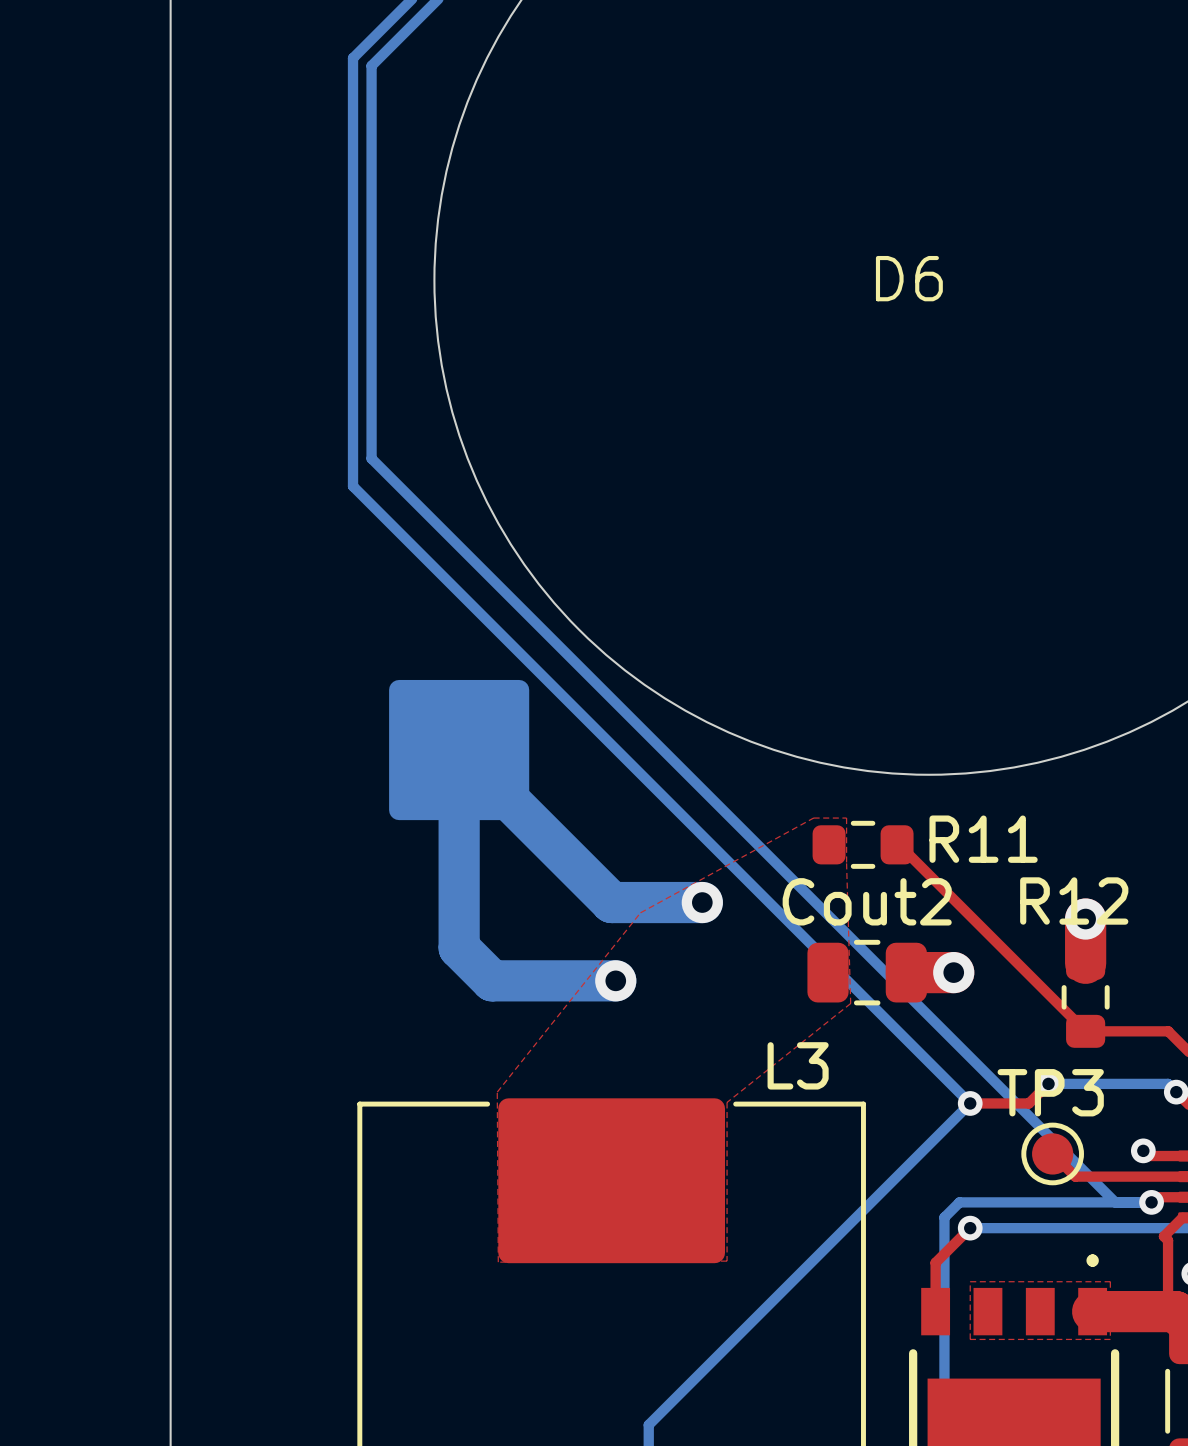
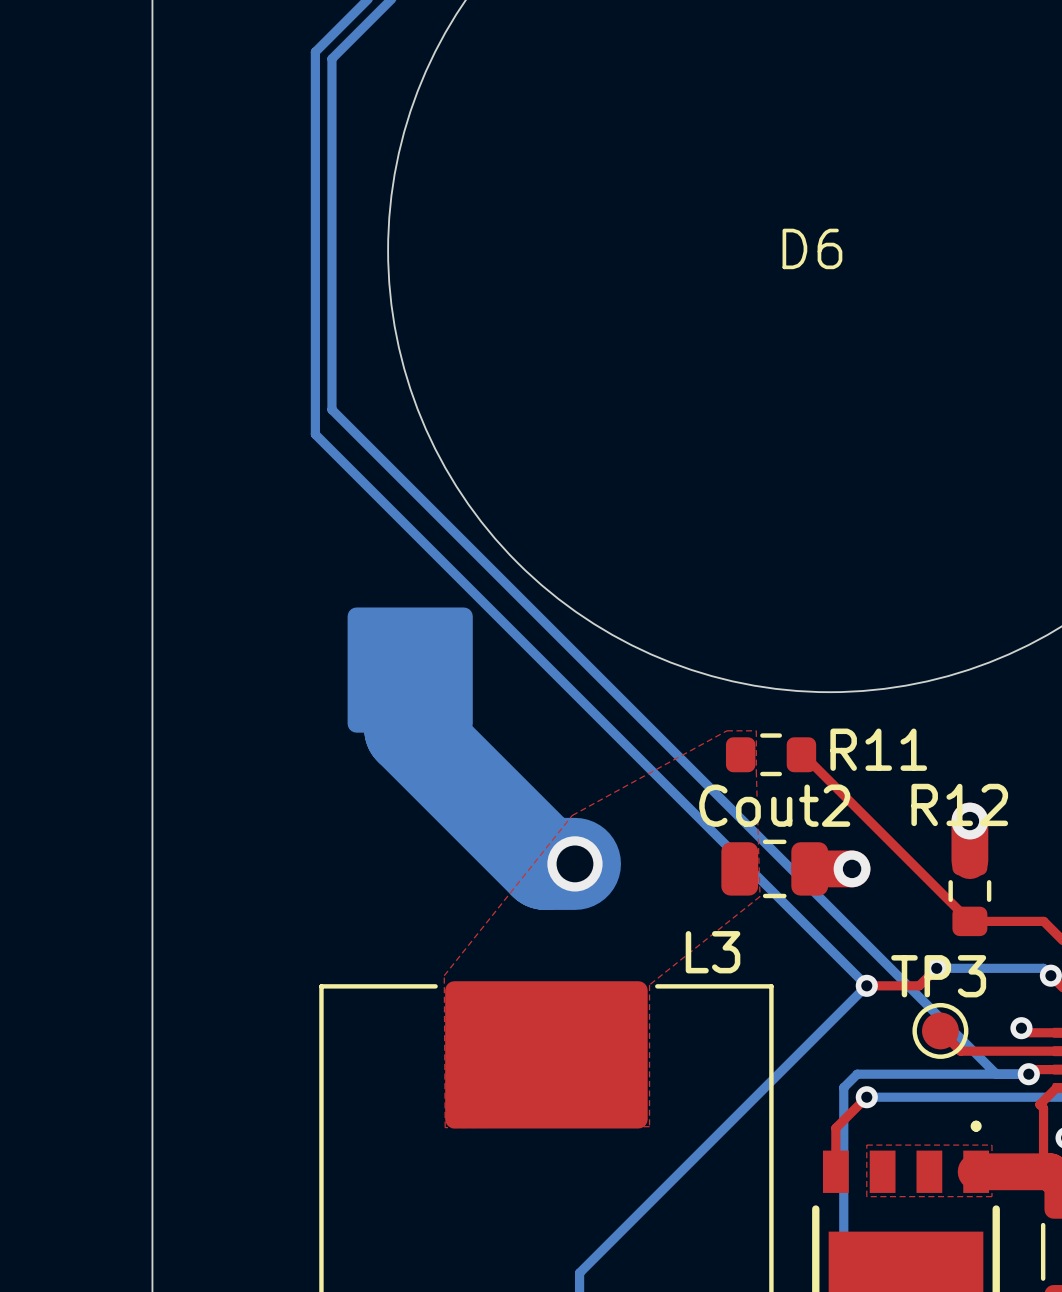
bottom track: (459, 750) (611, 902) (702, 902) -> none
bottom track: (459, 815) (459, 947) (492, 980) (615, 980) -> (410, 728) (545, 863) (574, 863)
via: (702, 902) -> none
via size: [595, 960, 637, 1002] -> [547, 836, 603, 892]

